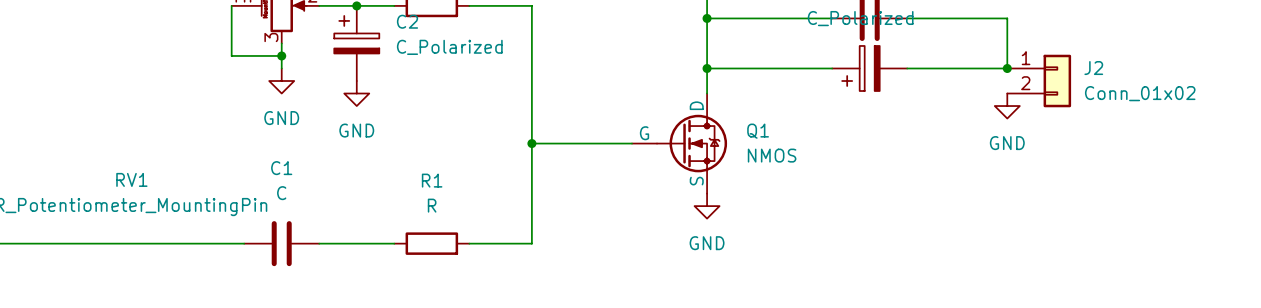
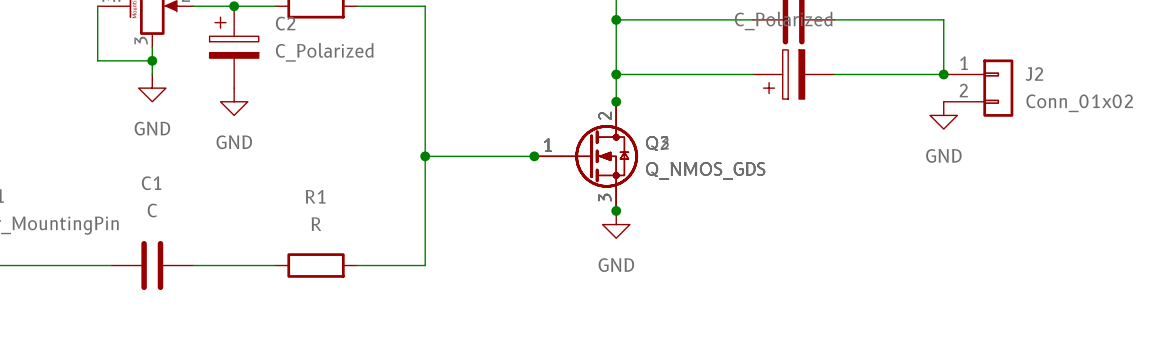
junction: none -> (616, 101)
junction: none -> (534, 156)
Q1: NMOS (679, 143) -> none
part: none -> Q_NMOS_GDS (586, 156)
part: none -> Q_NMOS_GDS (586, 156)
junction: none -> (616, 210)

